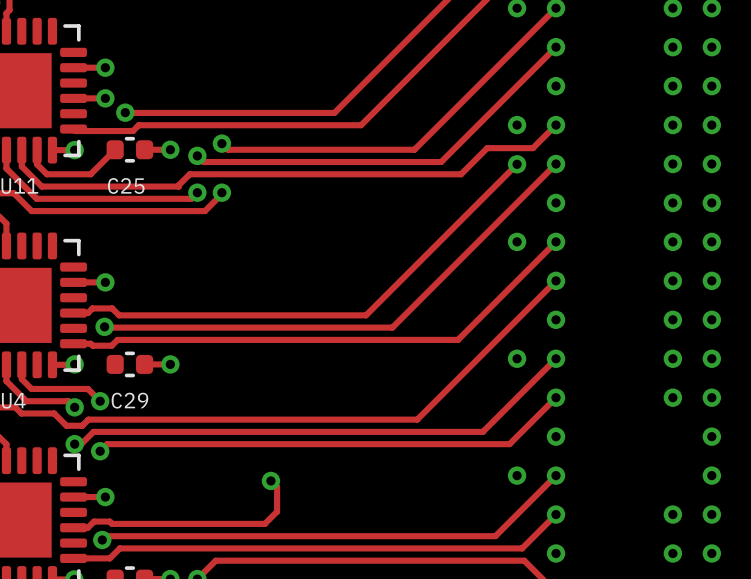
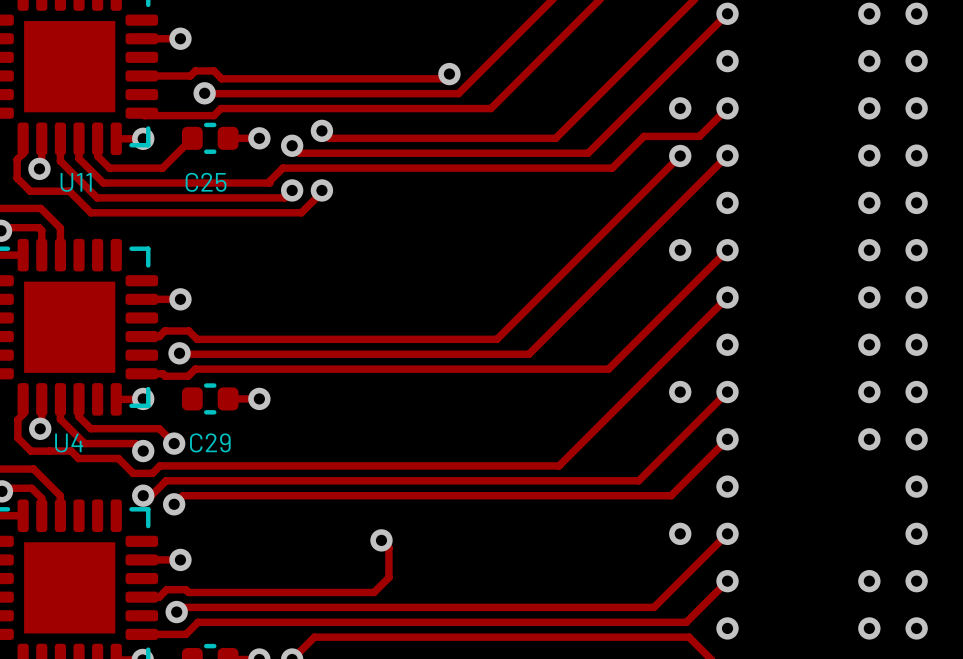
track: none -> (449, 74) (444, 78) (221, 78) (213, 70) (195, 70) (190, 75) (180, 75)
via: none -> (449, 74)
via: (105, 98) -> none

